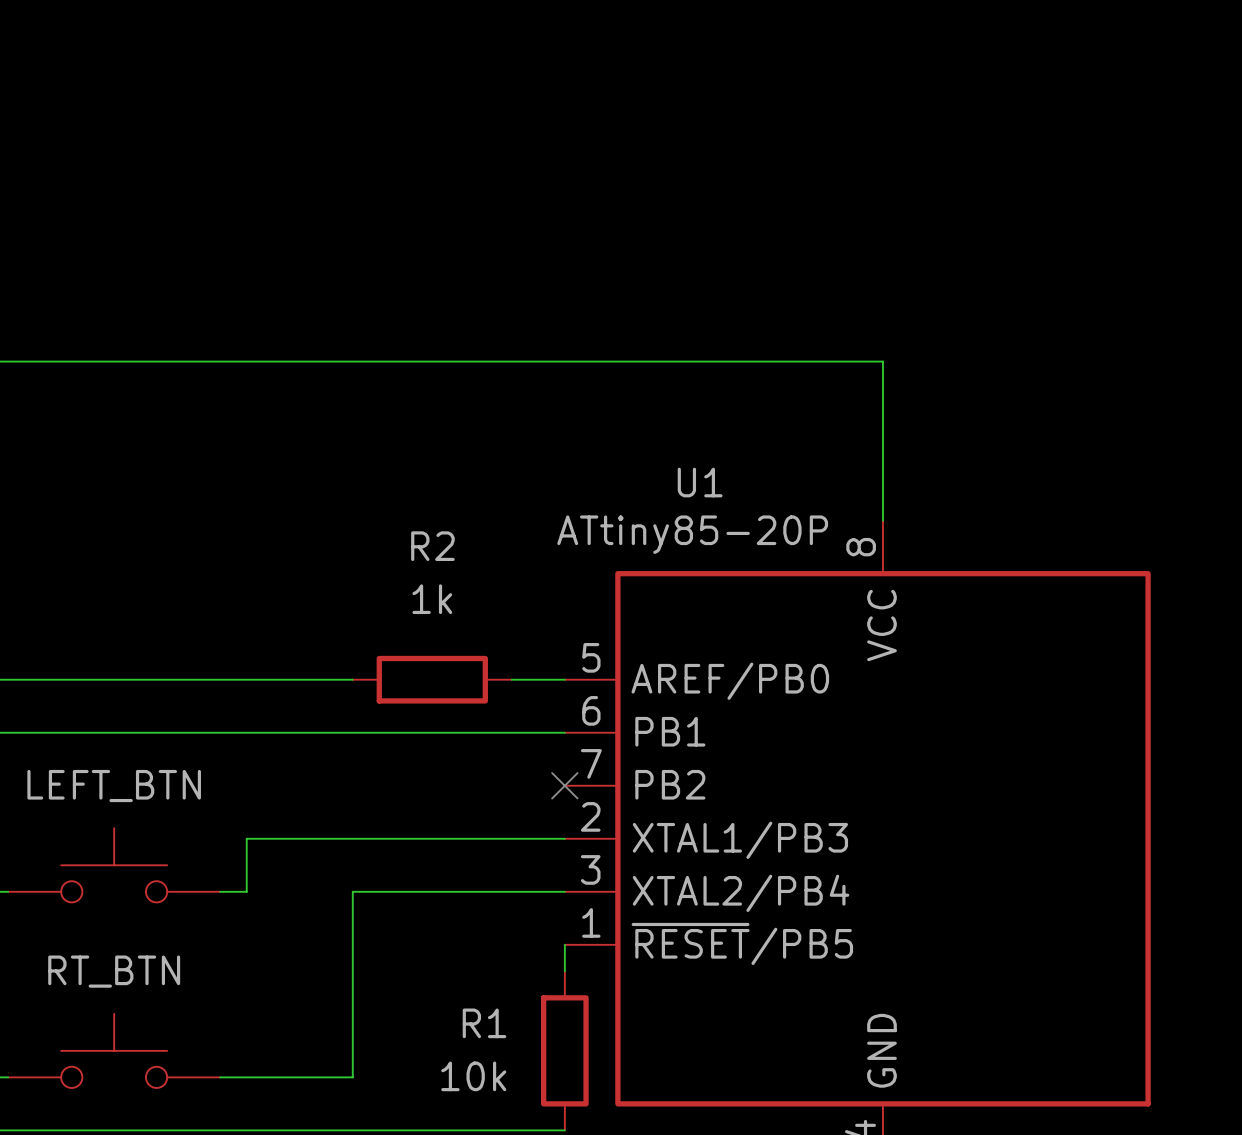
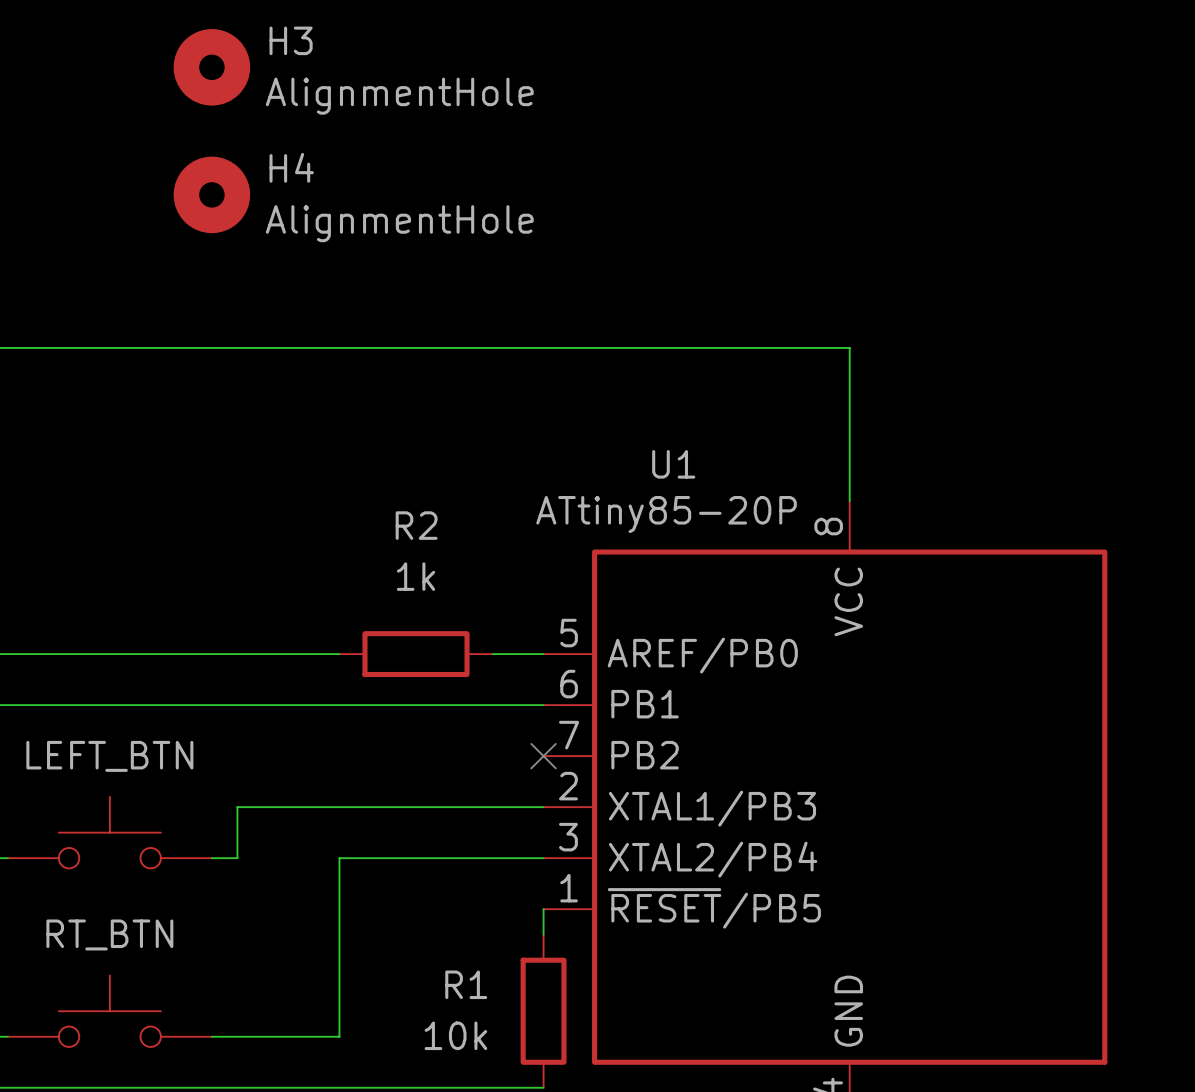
H3: none -> AlignmentHole (211, 67)
H4: none -> AlignmentHole (211, 194)

